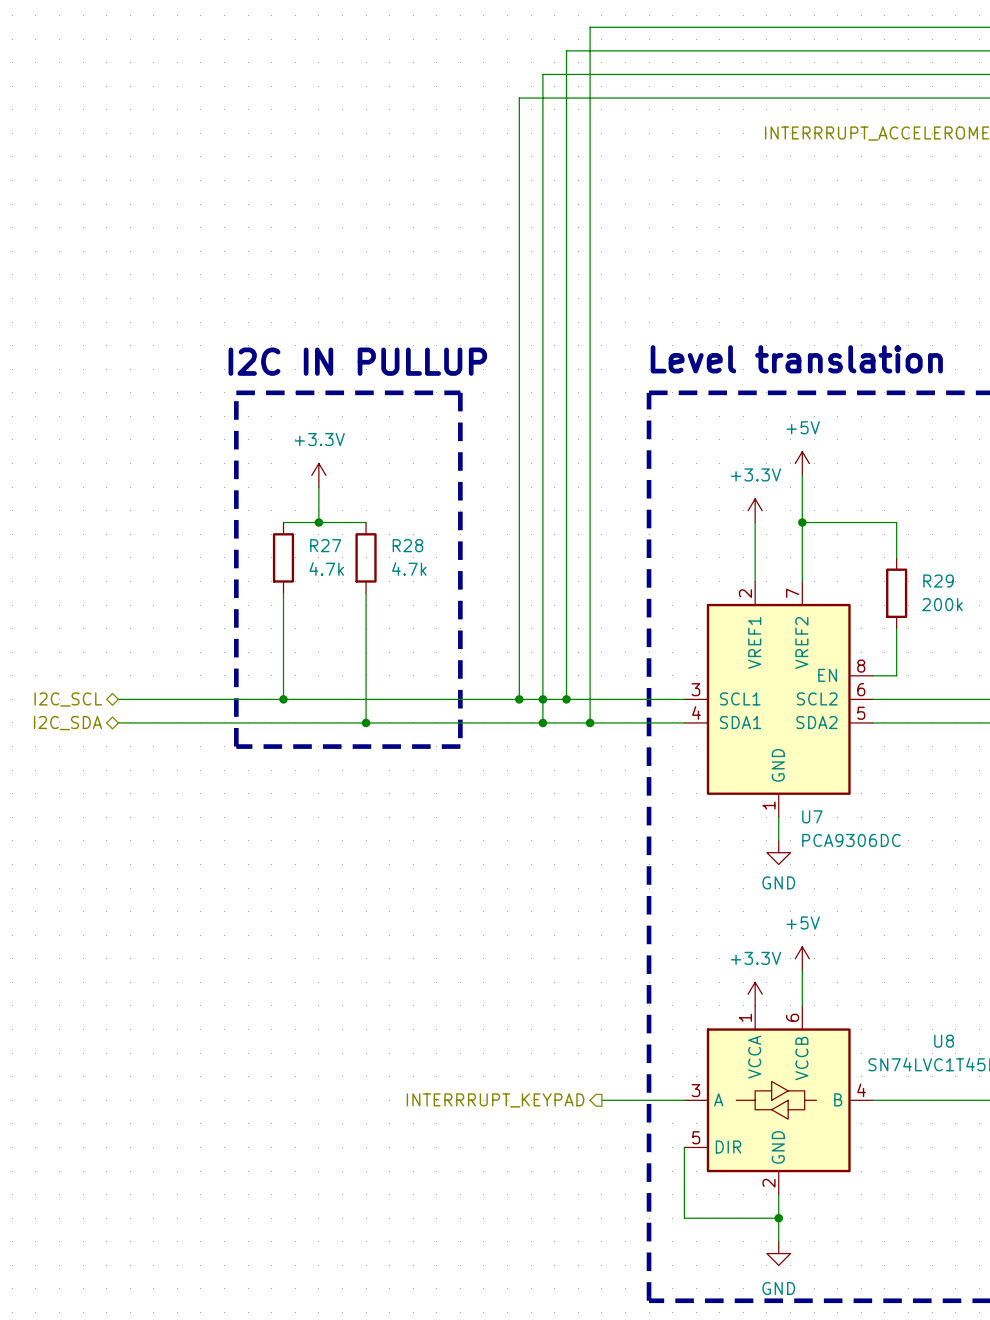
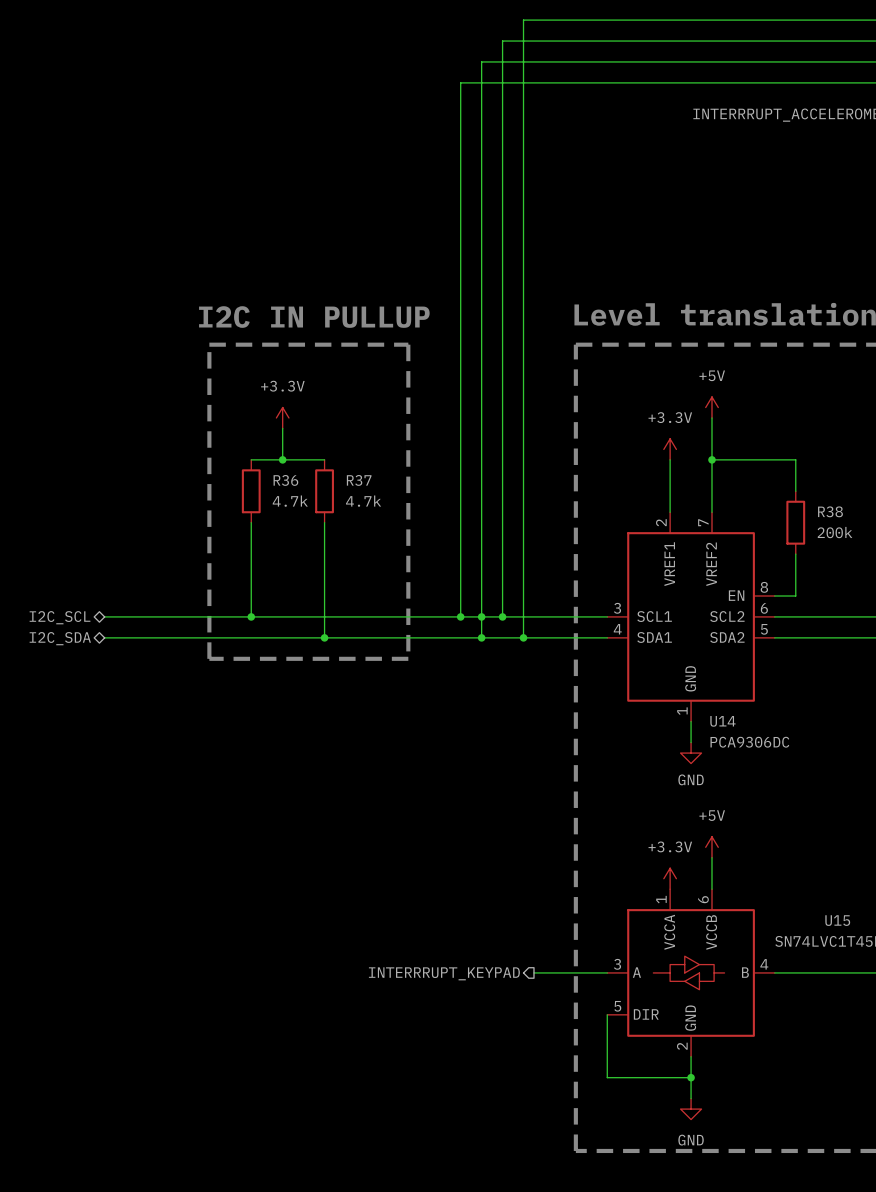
R27 name: R27 (325, 545) -> R36 (285, 480)
R28 name: R28 (407, 545) -> R37 (359, 480)
R29 name: R29 (938, 581) -> R38 (830, 511)
U7 name: U7 (812, 816) -> U14 (722, 721)
U8 name: U8 (944, 1041) -> U15 (837, 920)

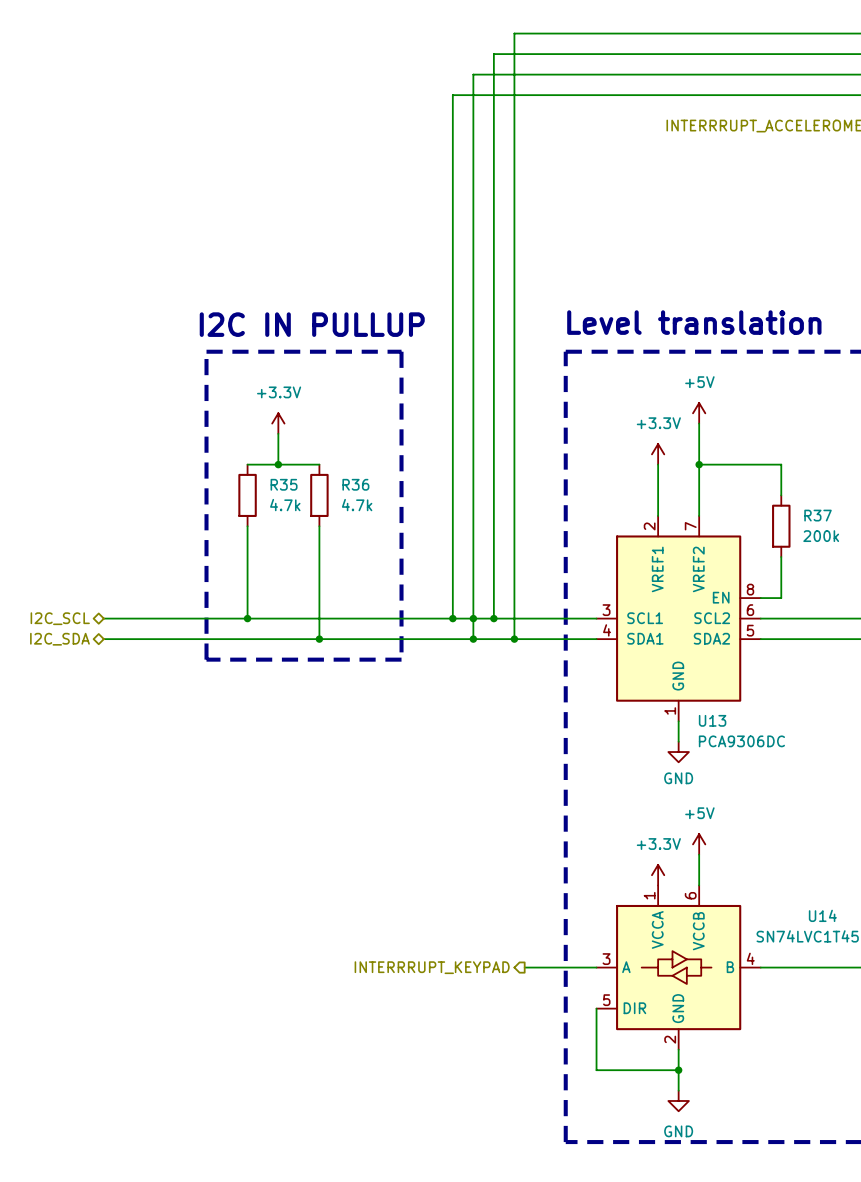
R36 name: R36 (285, 480) -> R35 (284, 484)
R37 name: R37 (359, 480) -> R36 (355, 484)
R38 name: R38 (830, 511) -> R37 (818, 515)
U14 name: U14 (722, 721) -> U13 (712, 720)
U15 name: U15 (837, 920) -> U14 (822, 915)

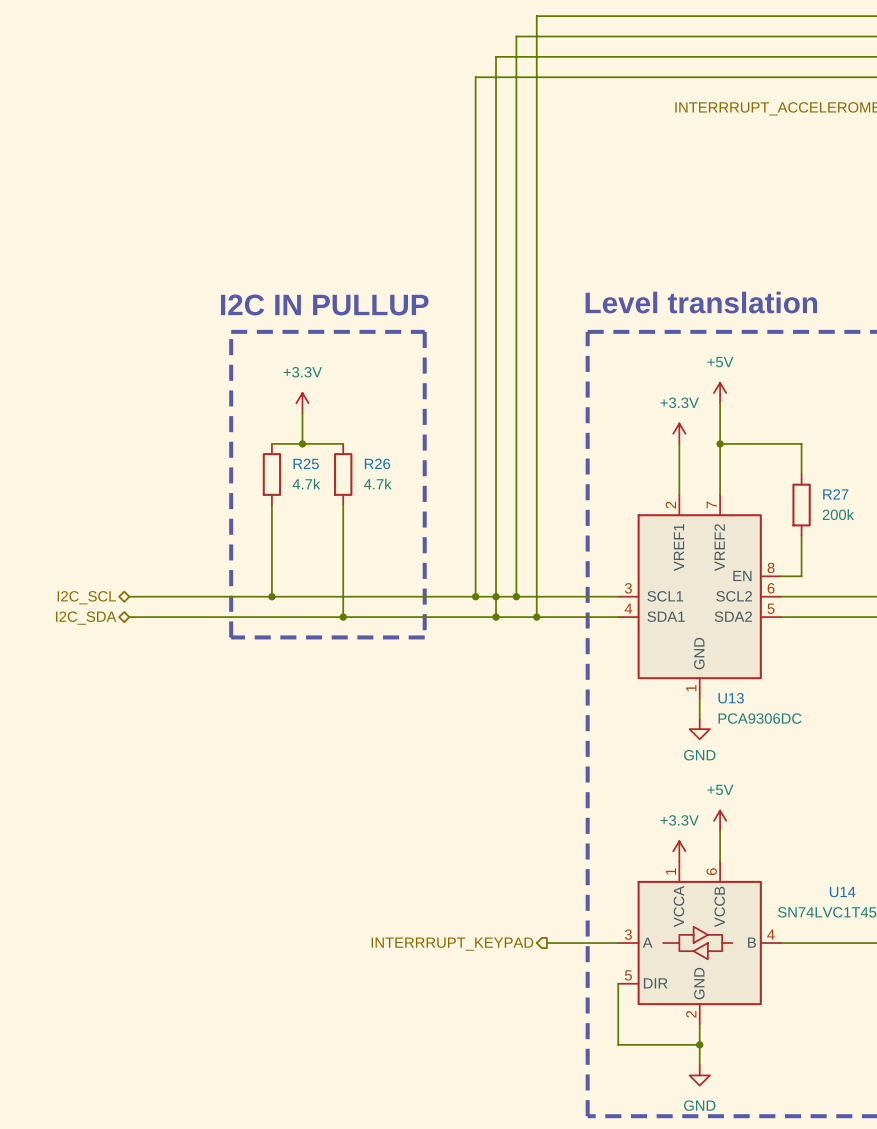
R35 name: R35 (284, 484) -> R25 (306, 463)
R36 name: R36 (355, 484) -> R26 (377, 463)
R37 name: R37 (818, 515) -> R27 (835, 494)

